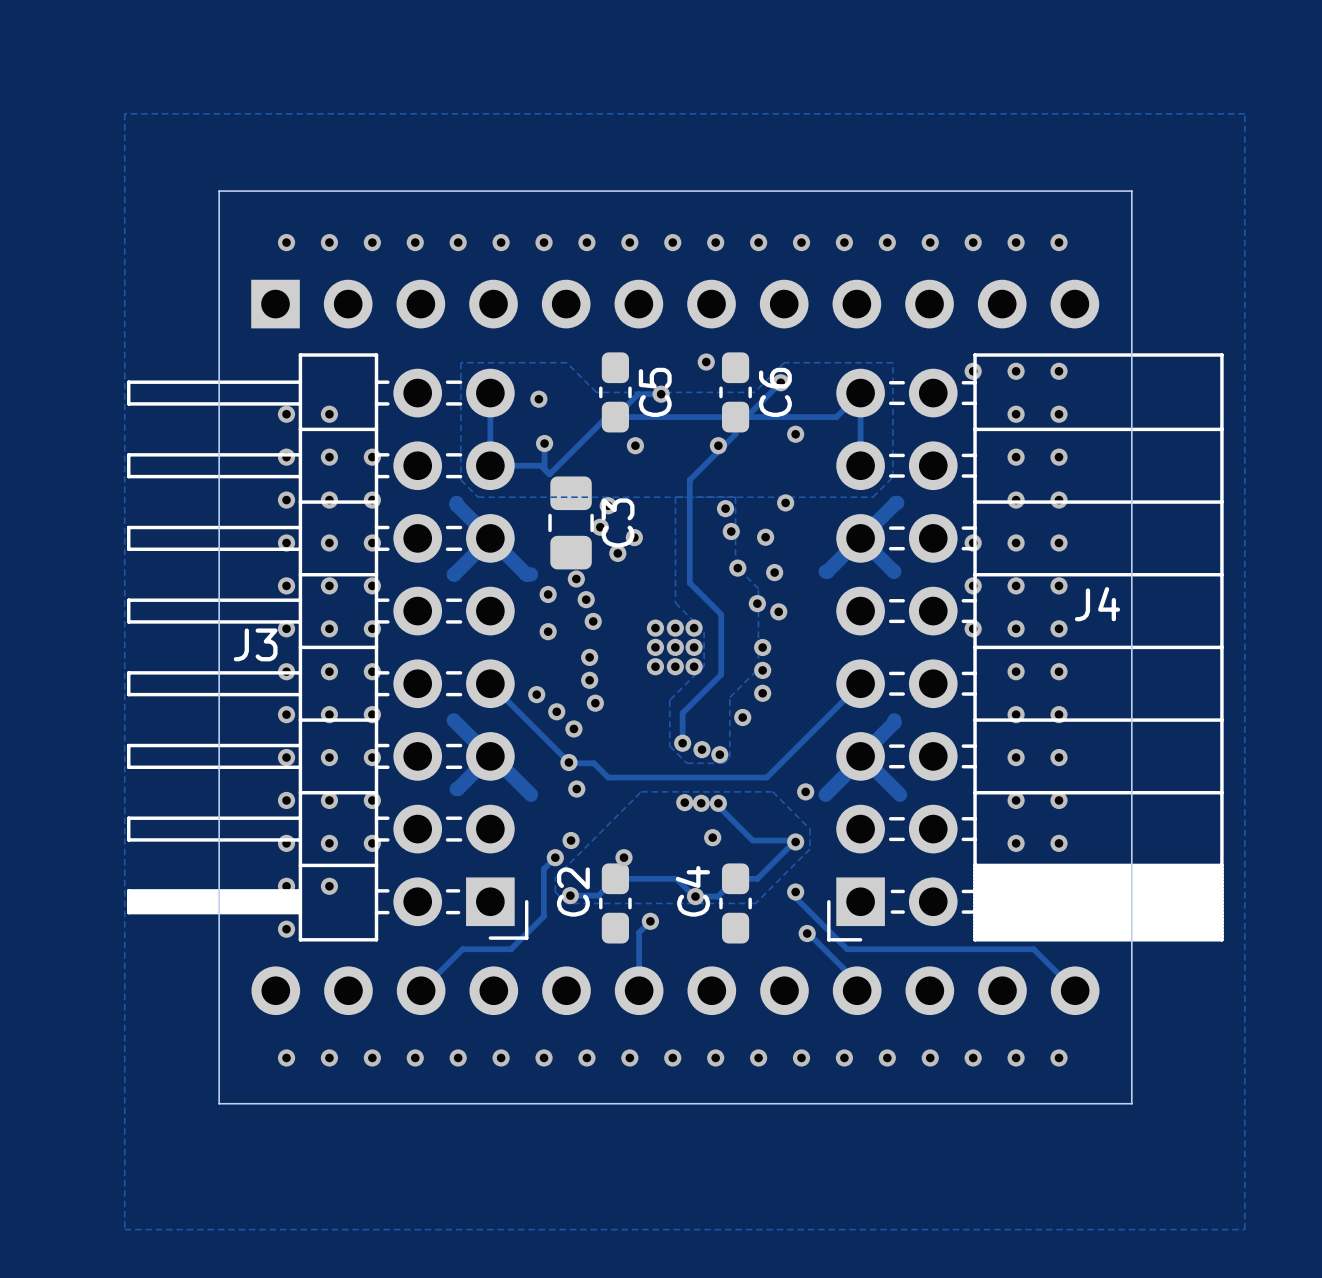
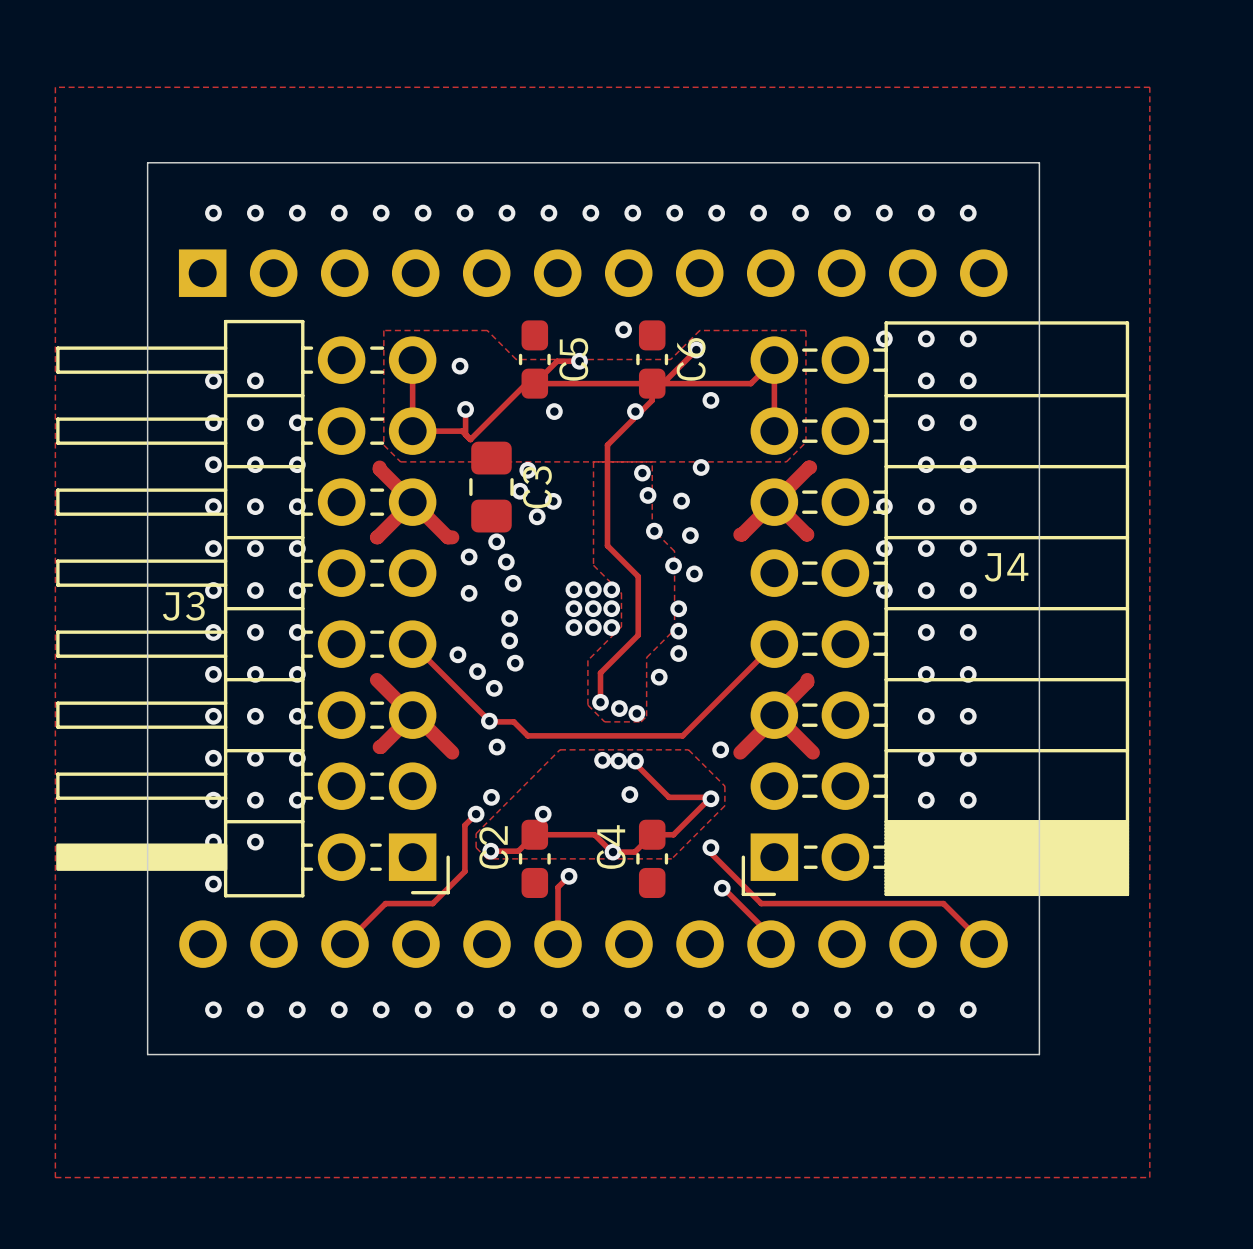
J3 footprint: [127, 353, 529, 942] -> [56, 319, 450, 898]

